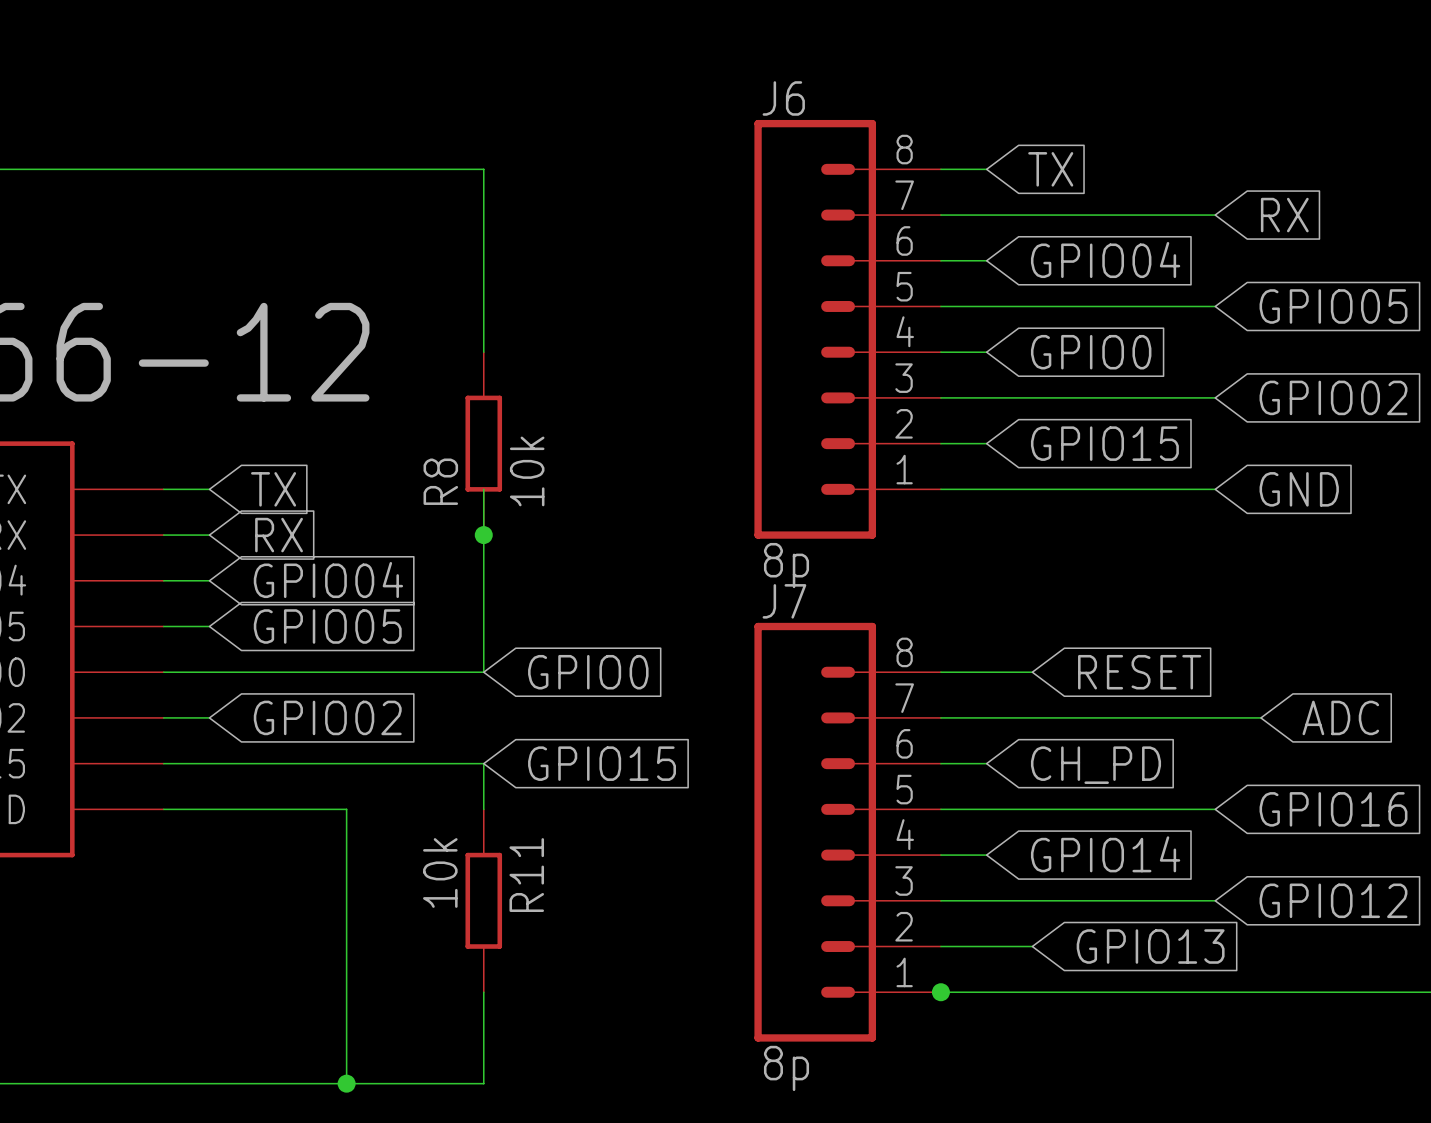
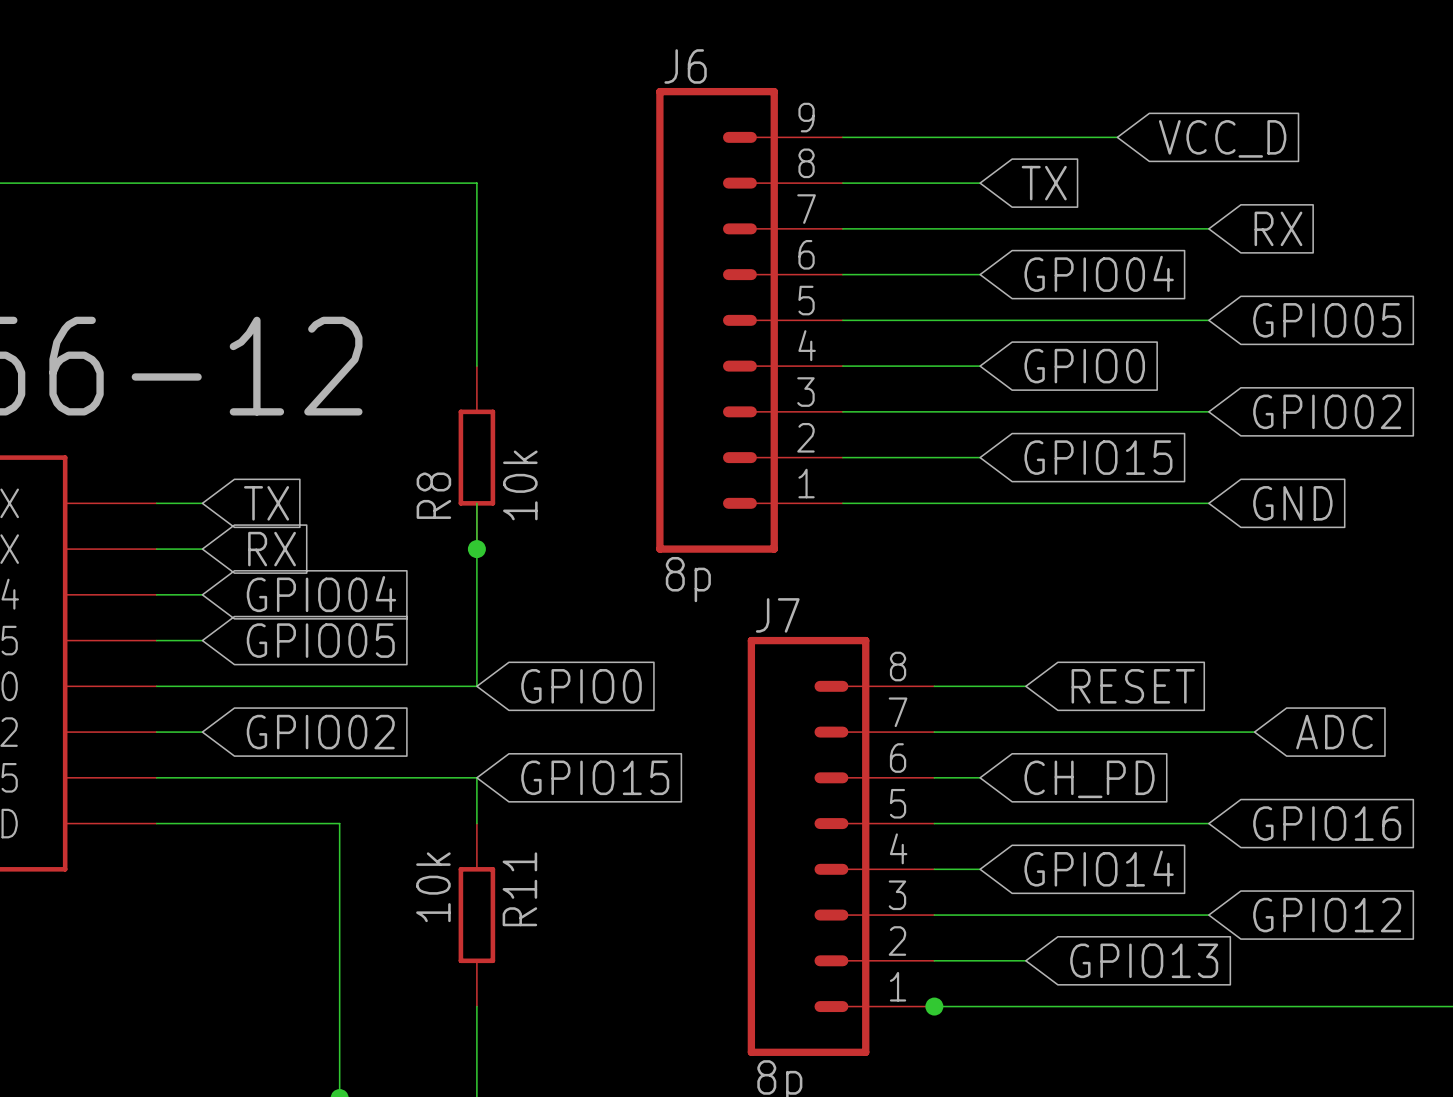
J6 symbol: [754, 119, 941, 539] -> [656, 87, 843, 553]
wire: none -> (842, 137) (1117, 137)
global label: none -> VCC_D (1222, 138)

